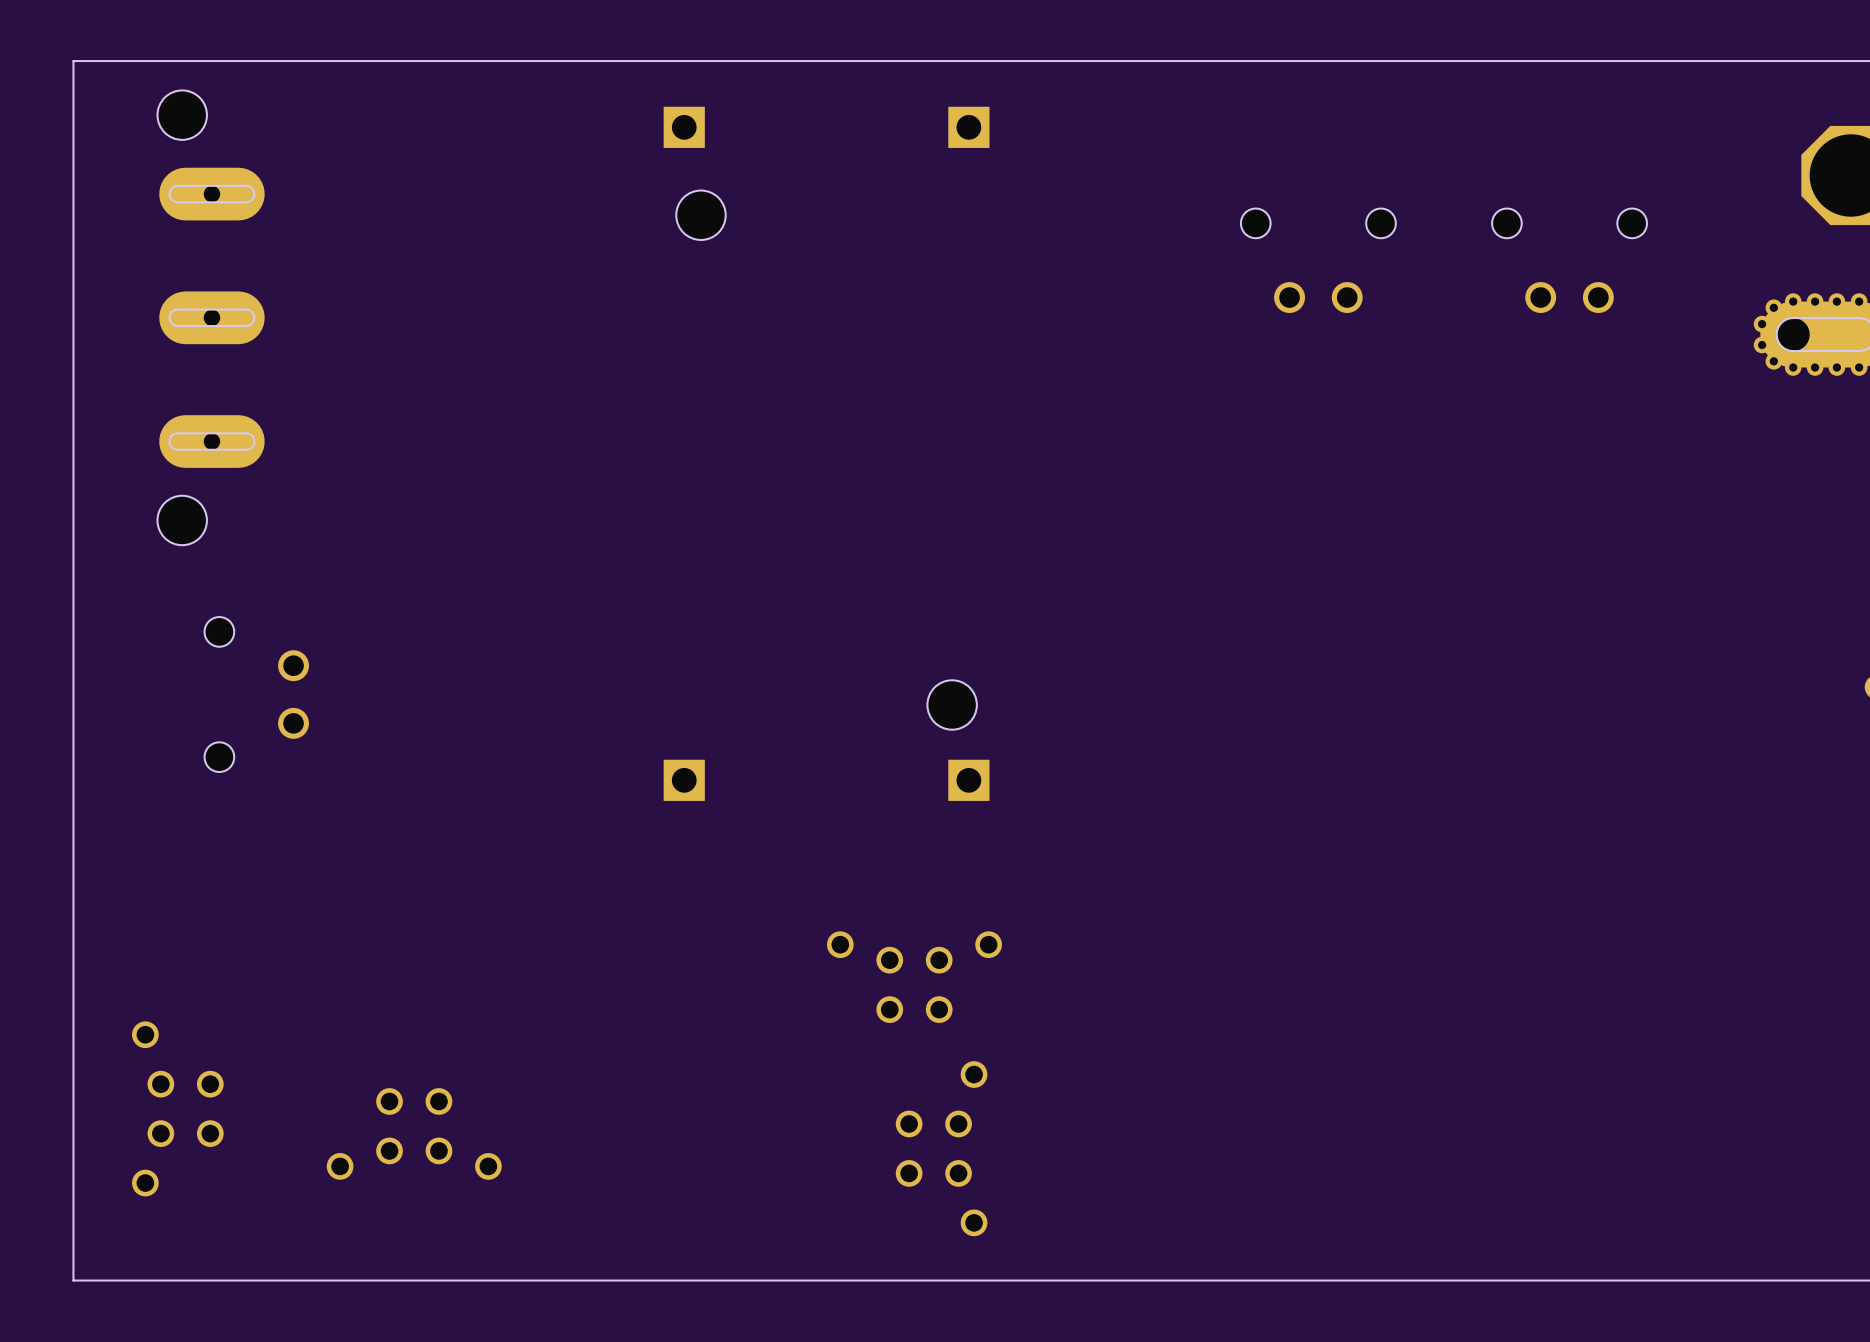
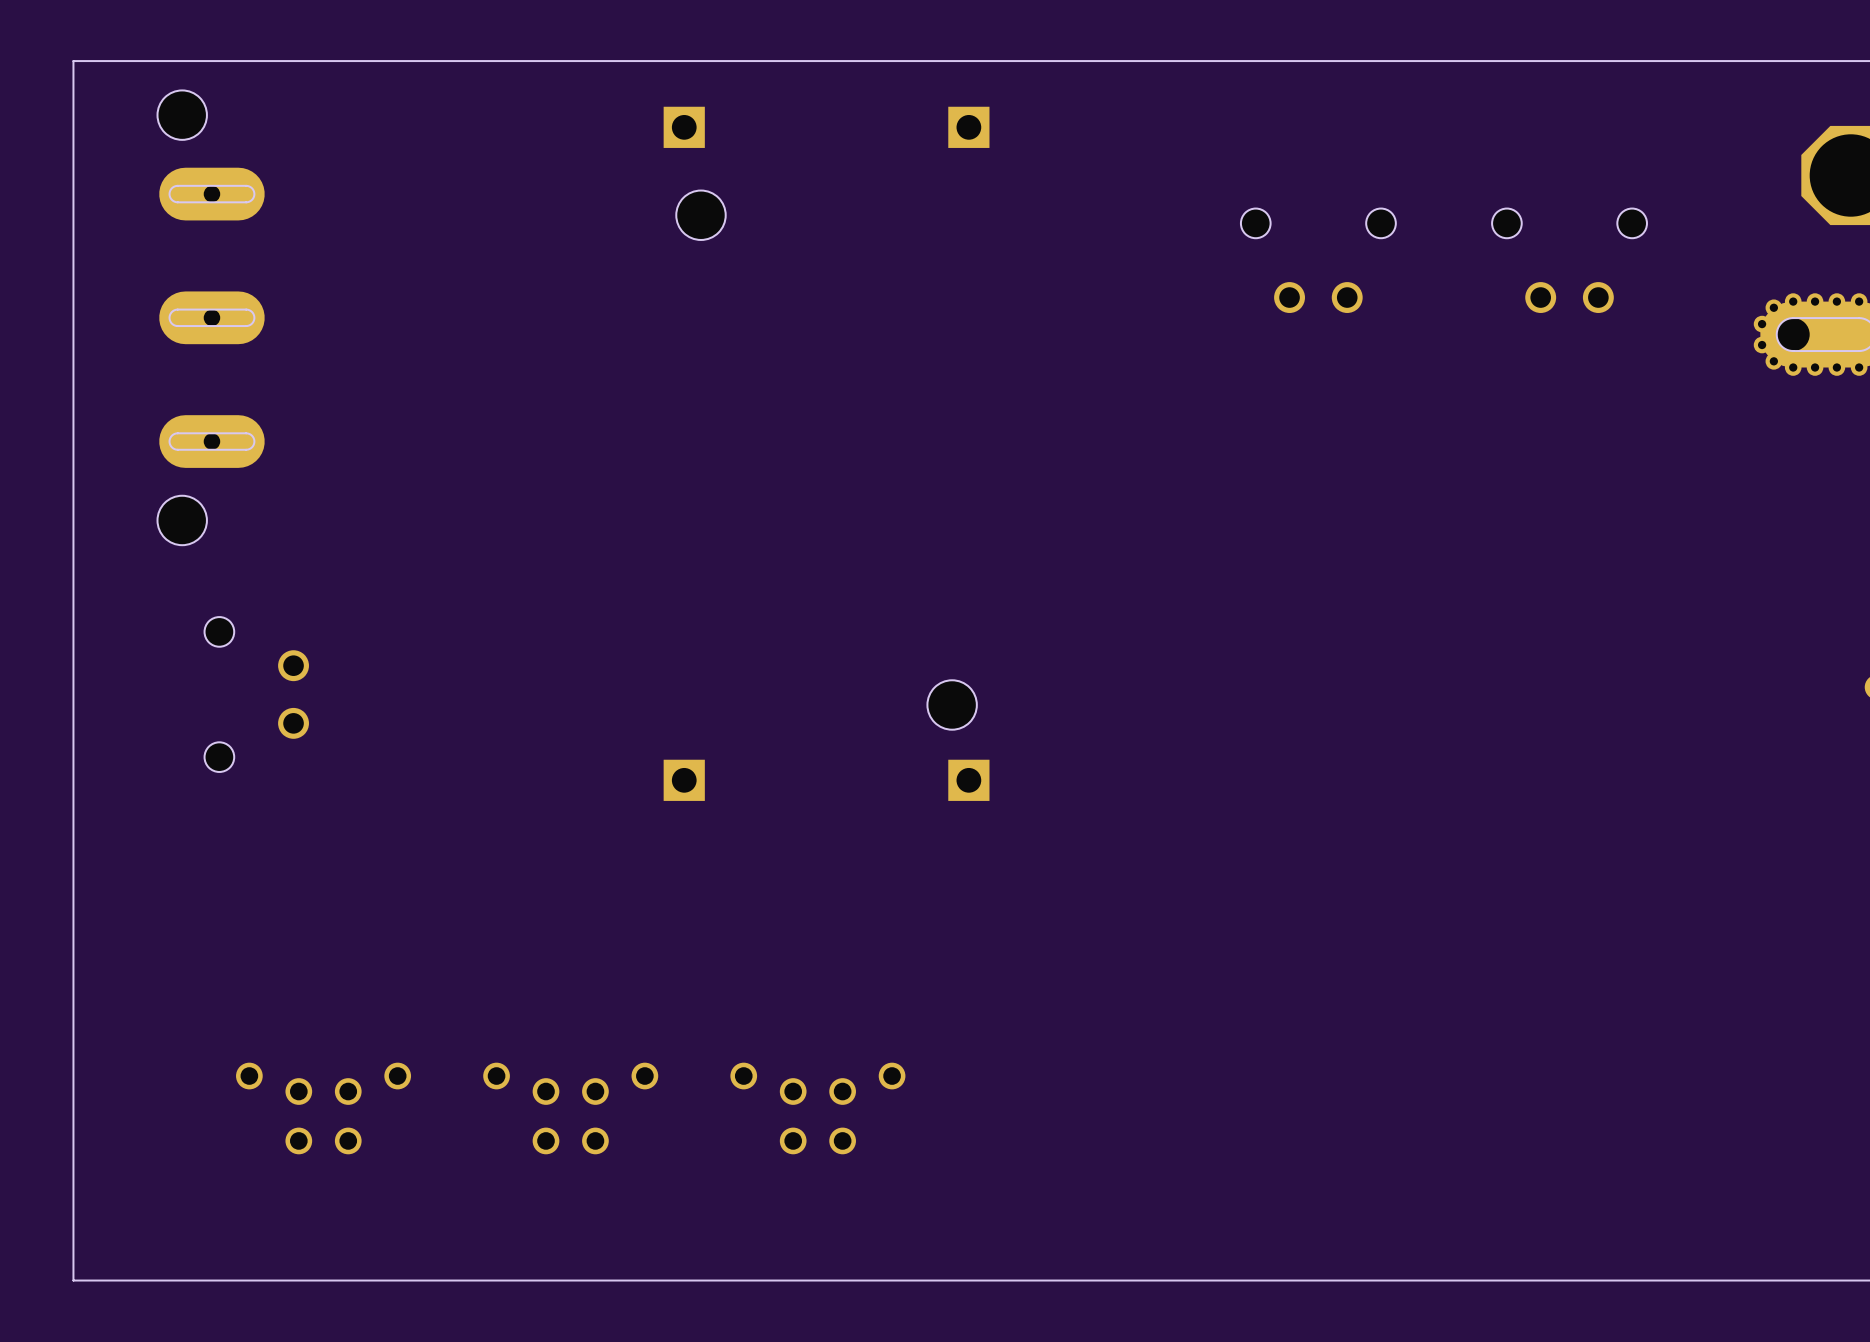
part: (914, 977) -> none
part: (177, 1108) -> none
part: none -> (323, 1108)
part: none -> (570, 1108)
part: none -> (817, 1108)
part: (414, 1133) -> none
part: (941, 1148) -> none

